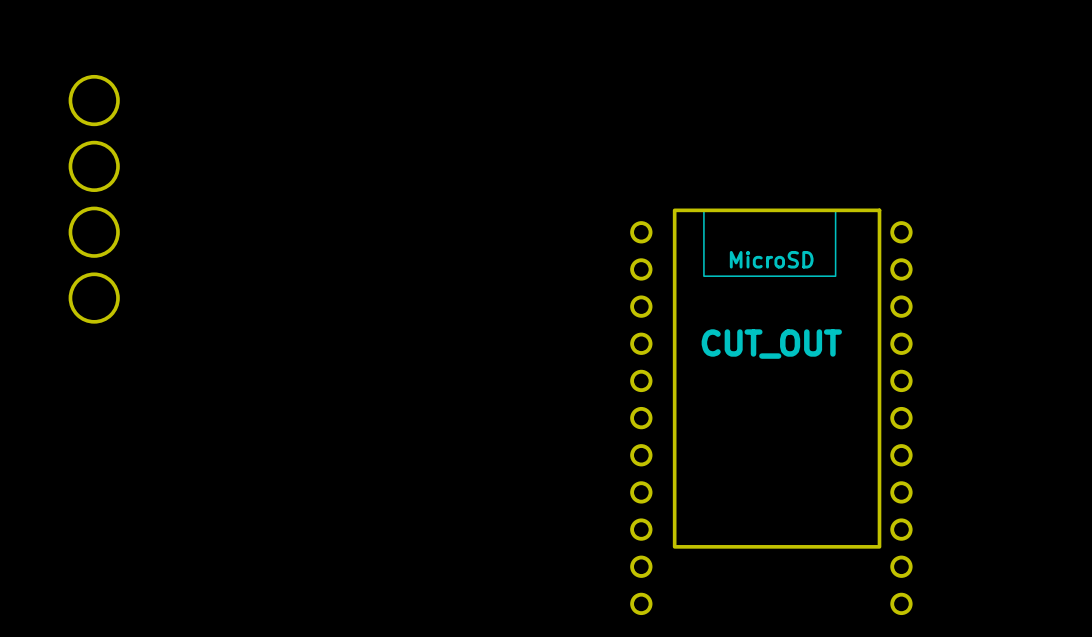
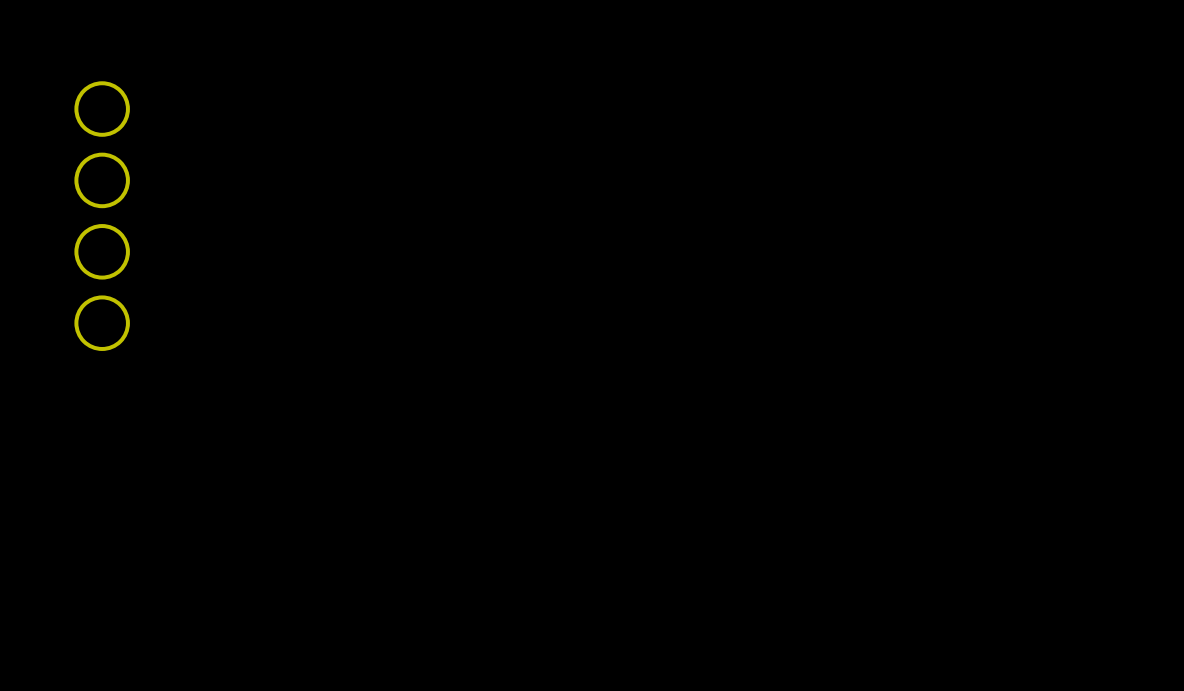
part: (771, 411) -> none

